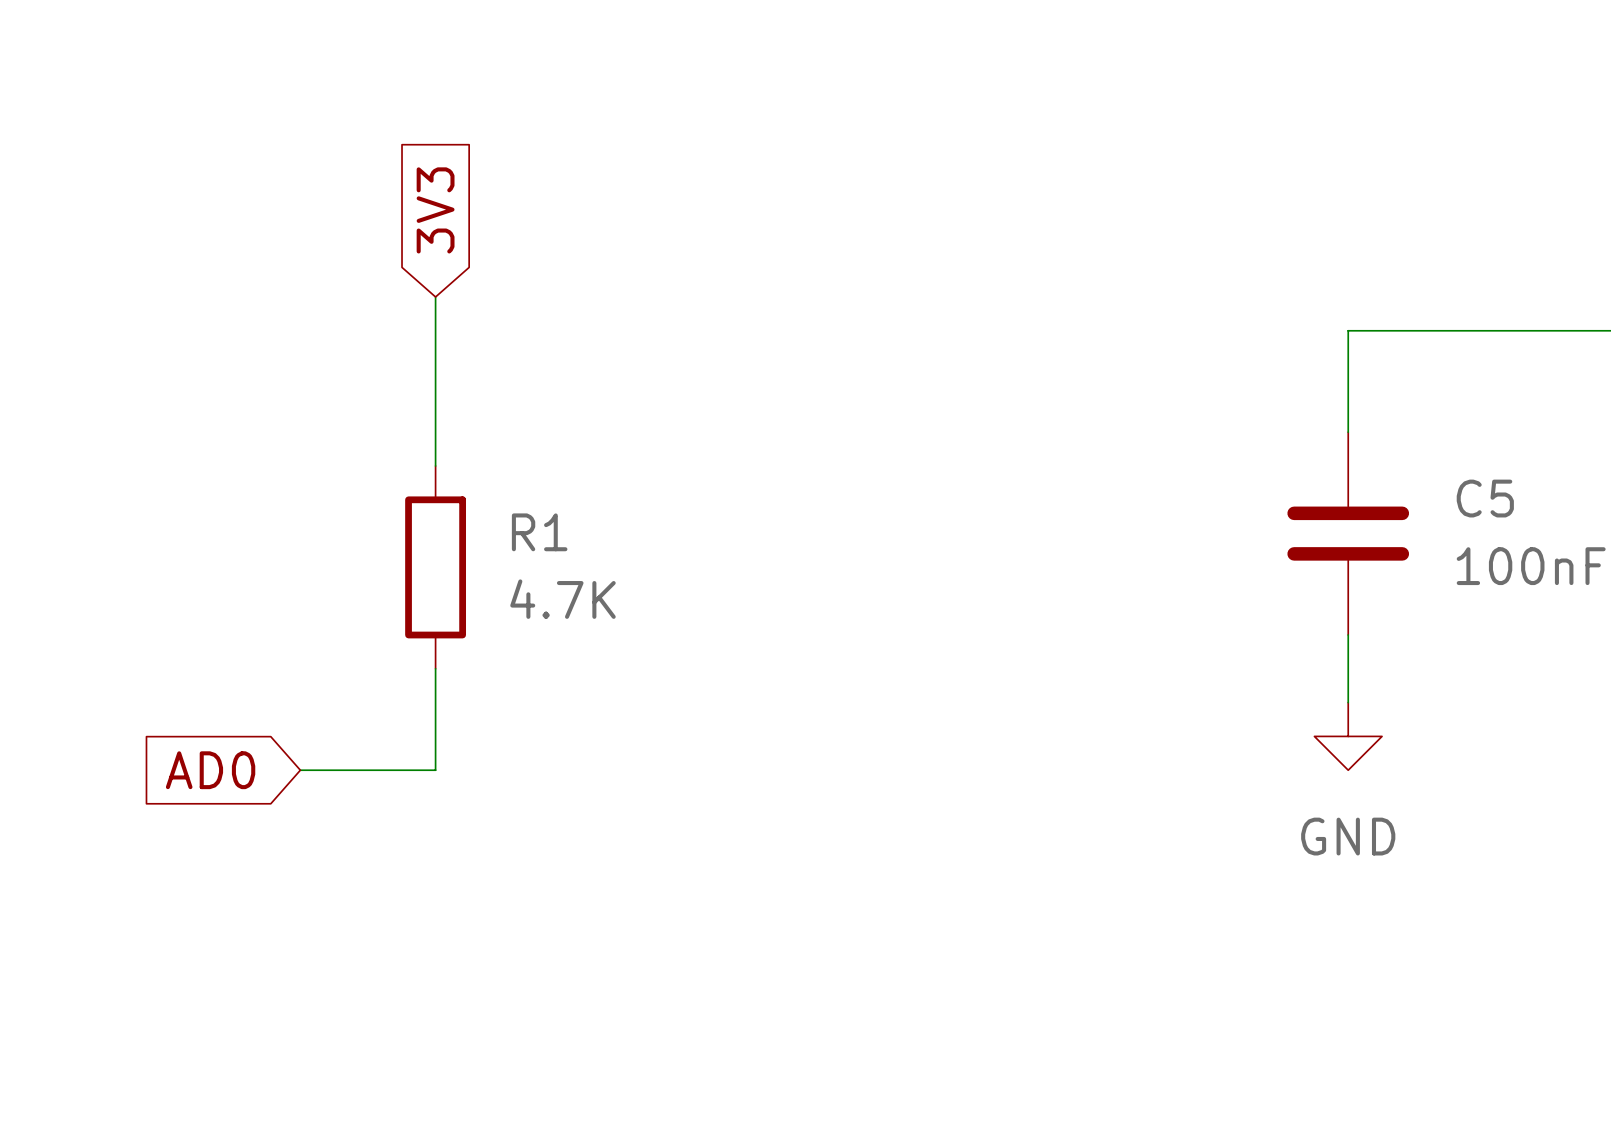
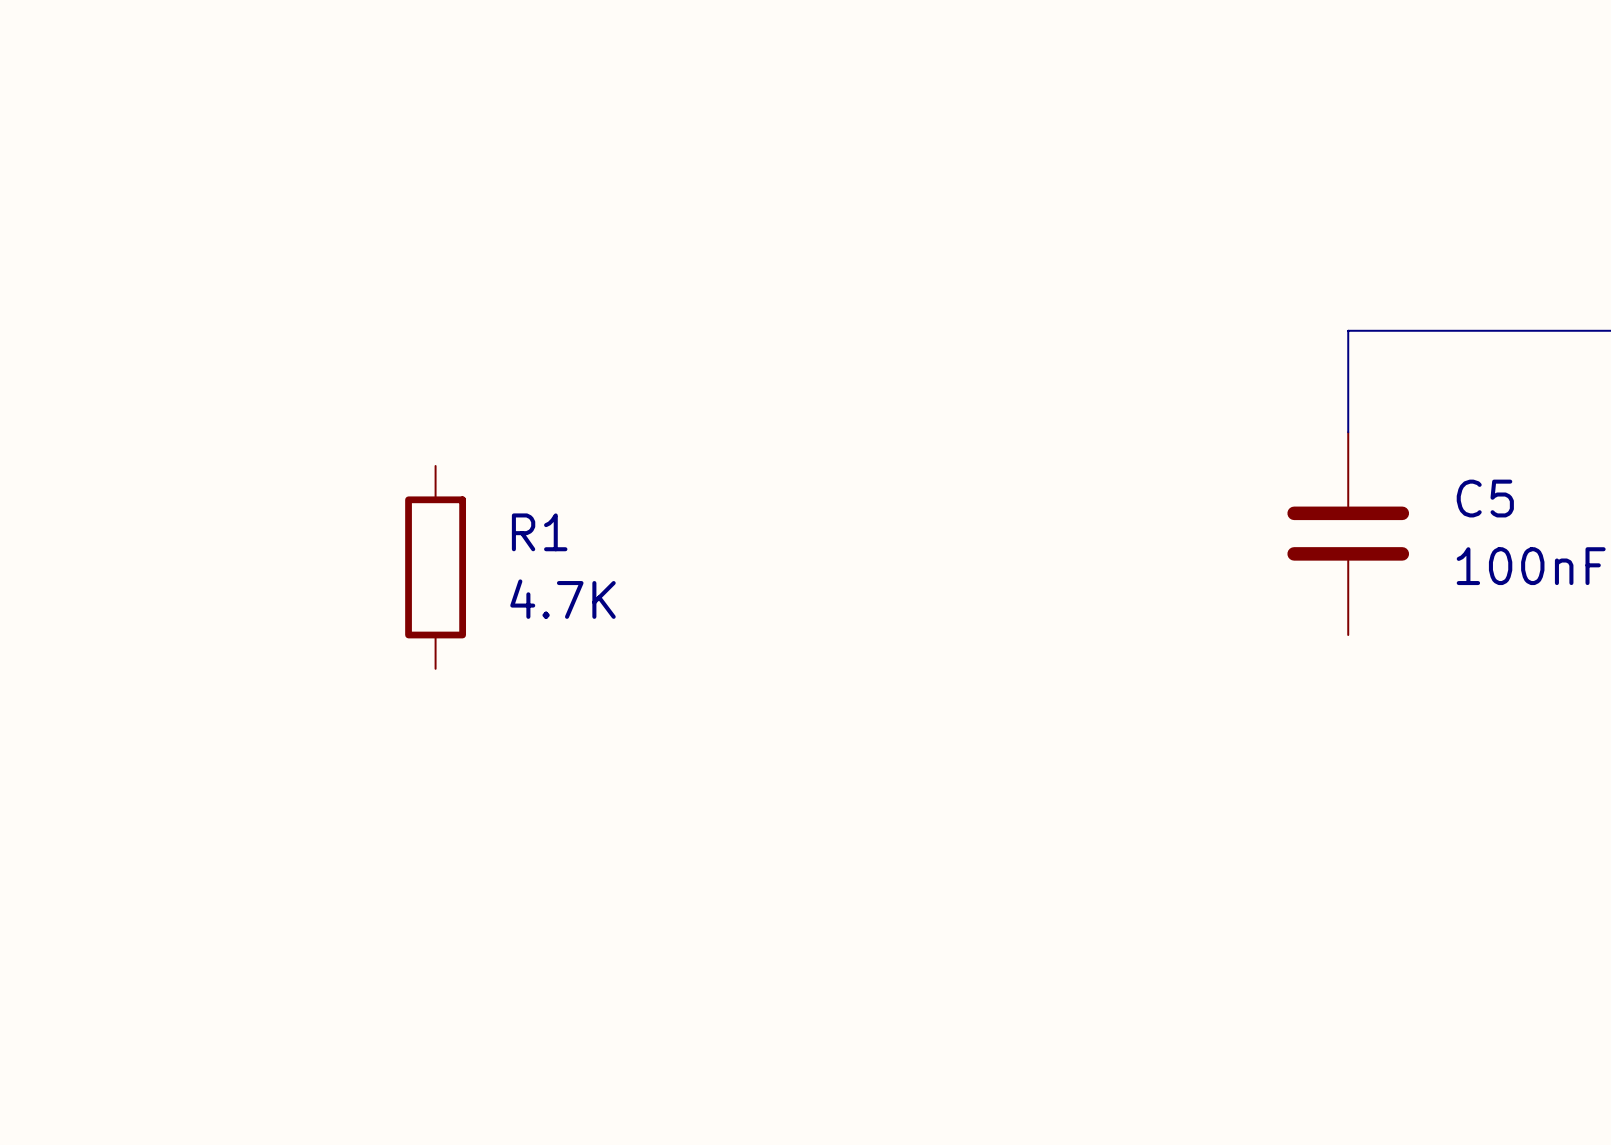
global label: 3V3 (435, 210) -> none
wire: (435, 296) (435, 466) -> none
wire: (1348, 635) (1348, 702) -> none
wire: (435, 668) (435, 770) (300, 770) -> none
power symbol: GND (1348, 736) -> none
global label: AD0 (210, 770) -> none

